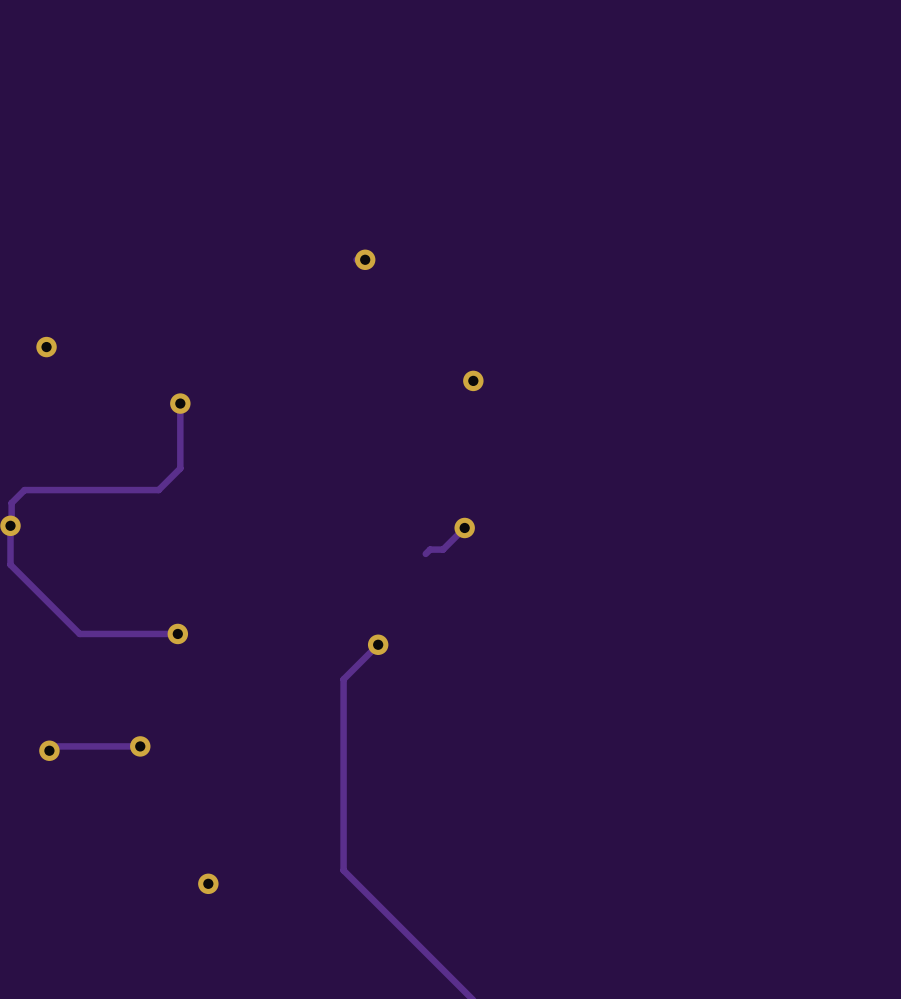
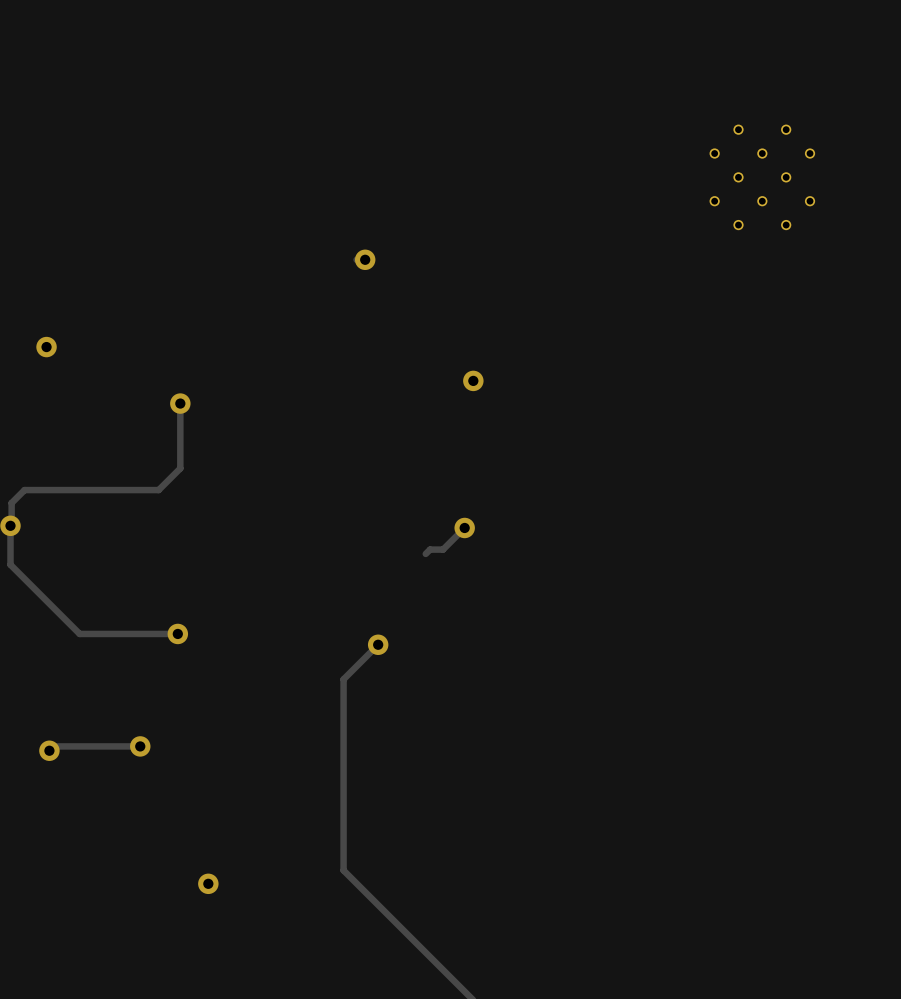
part: none -> (762, 177)

